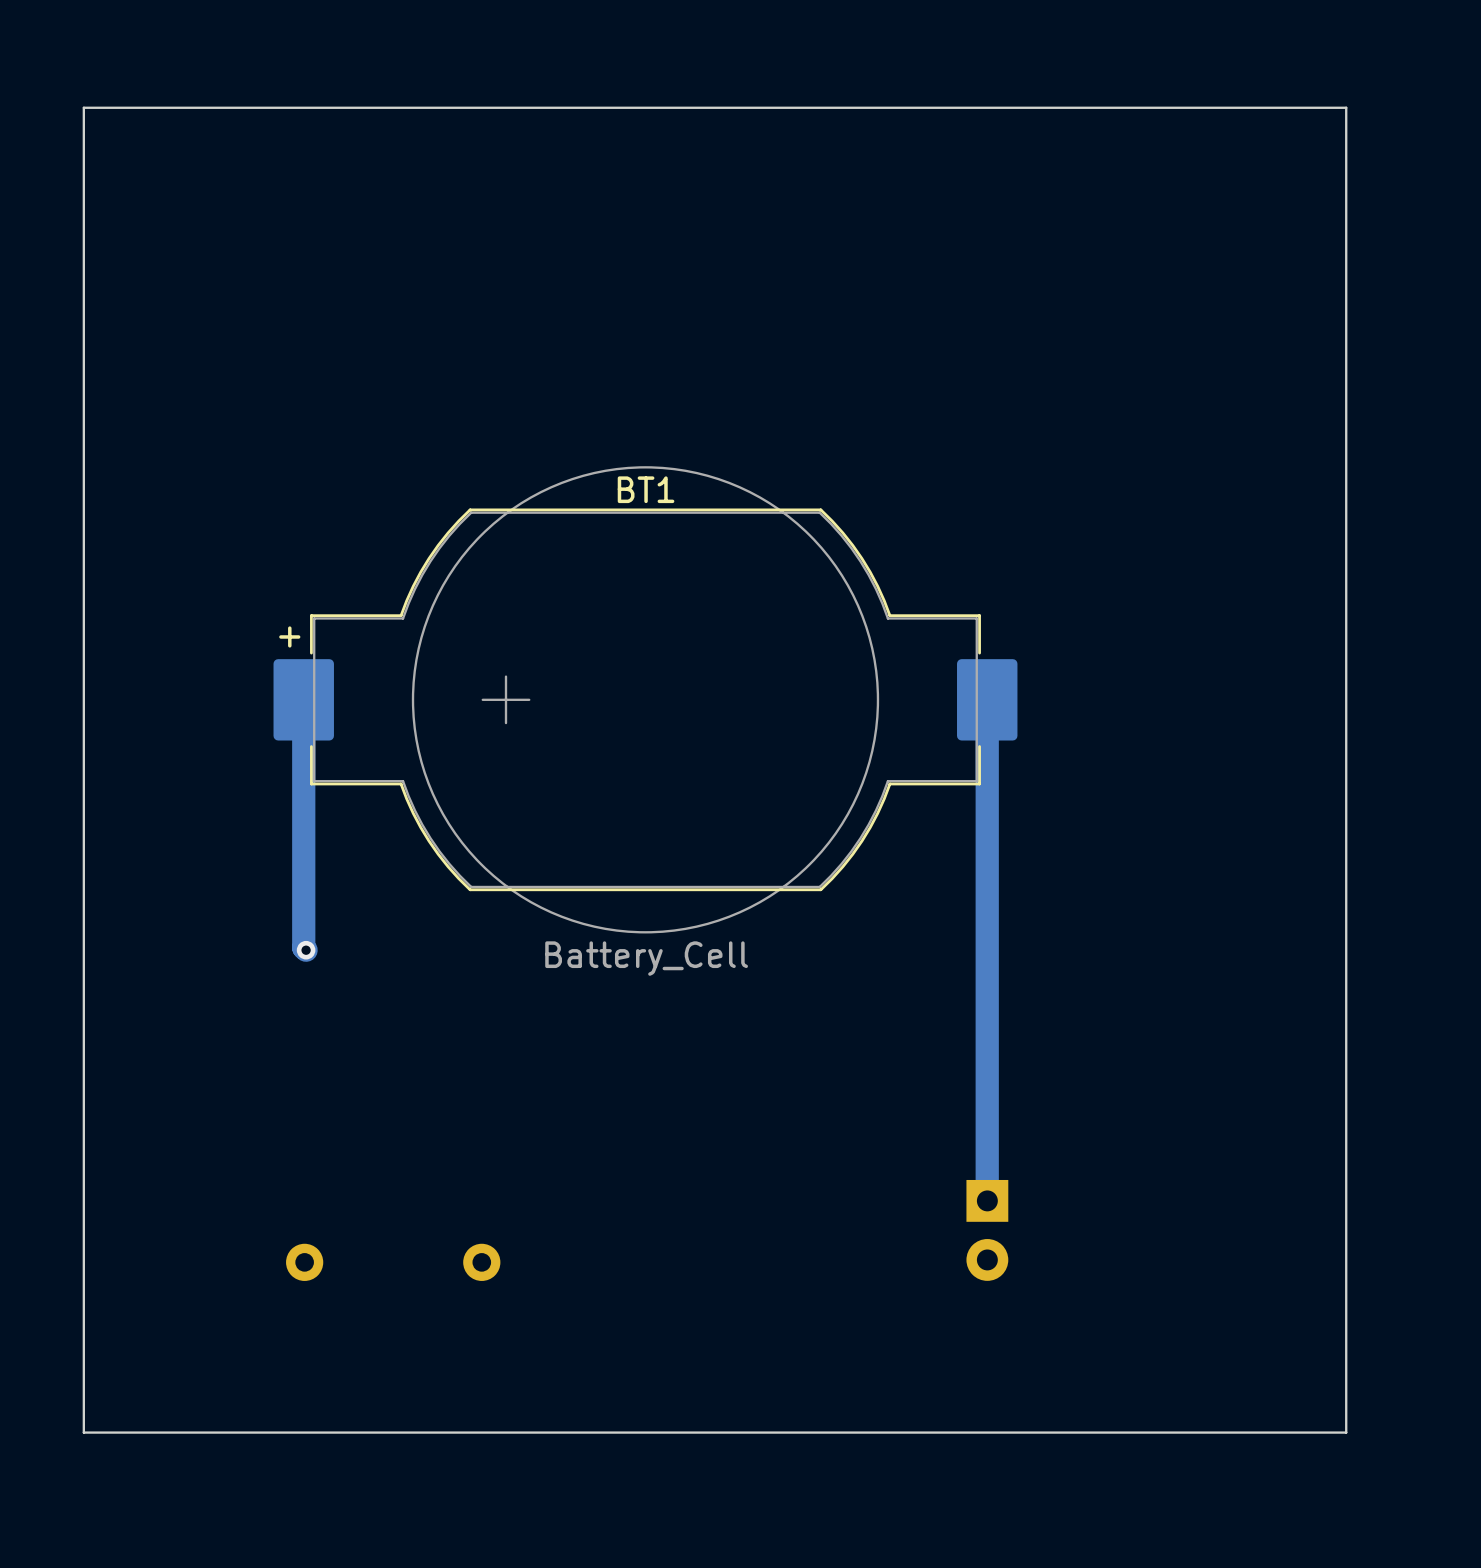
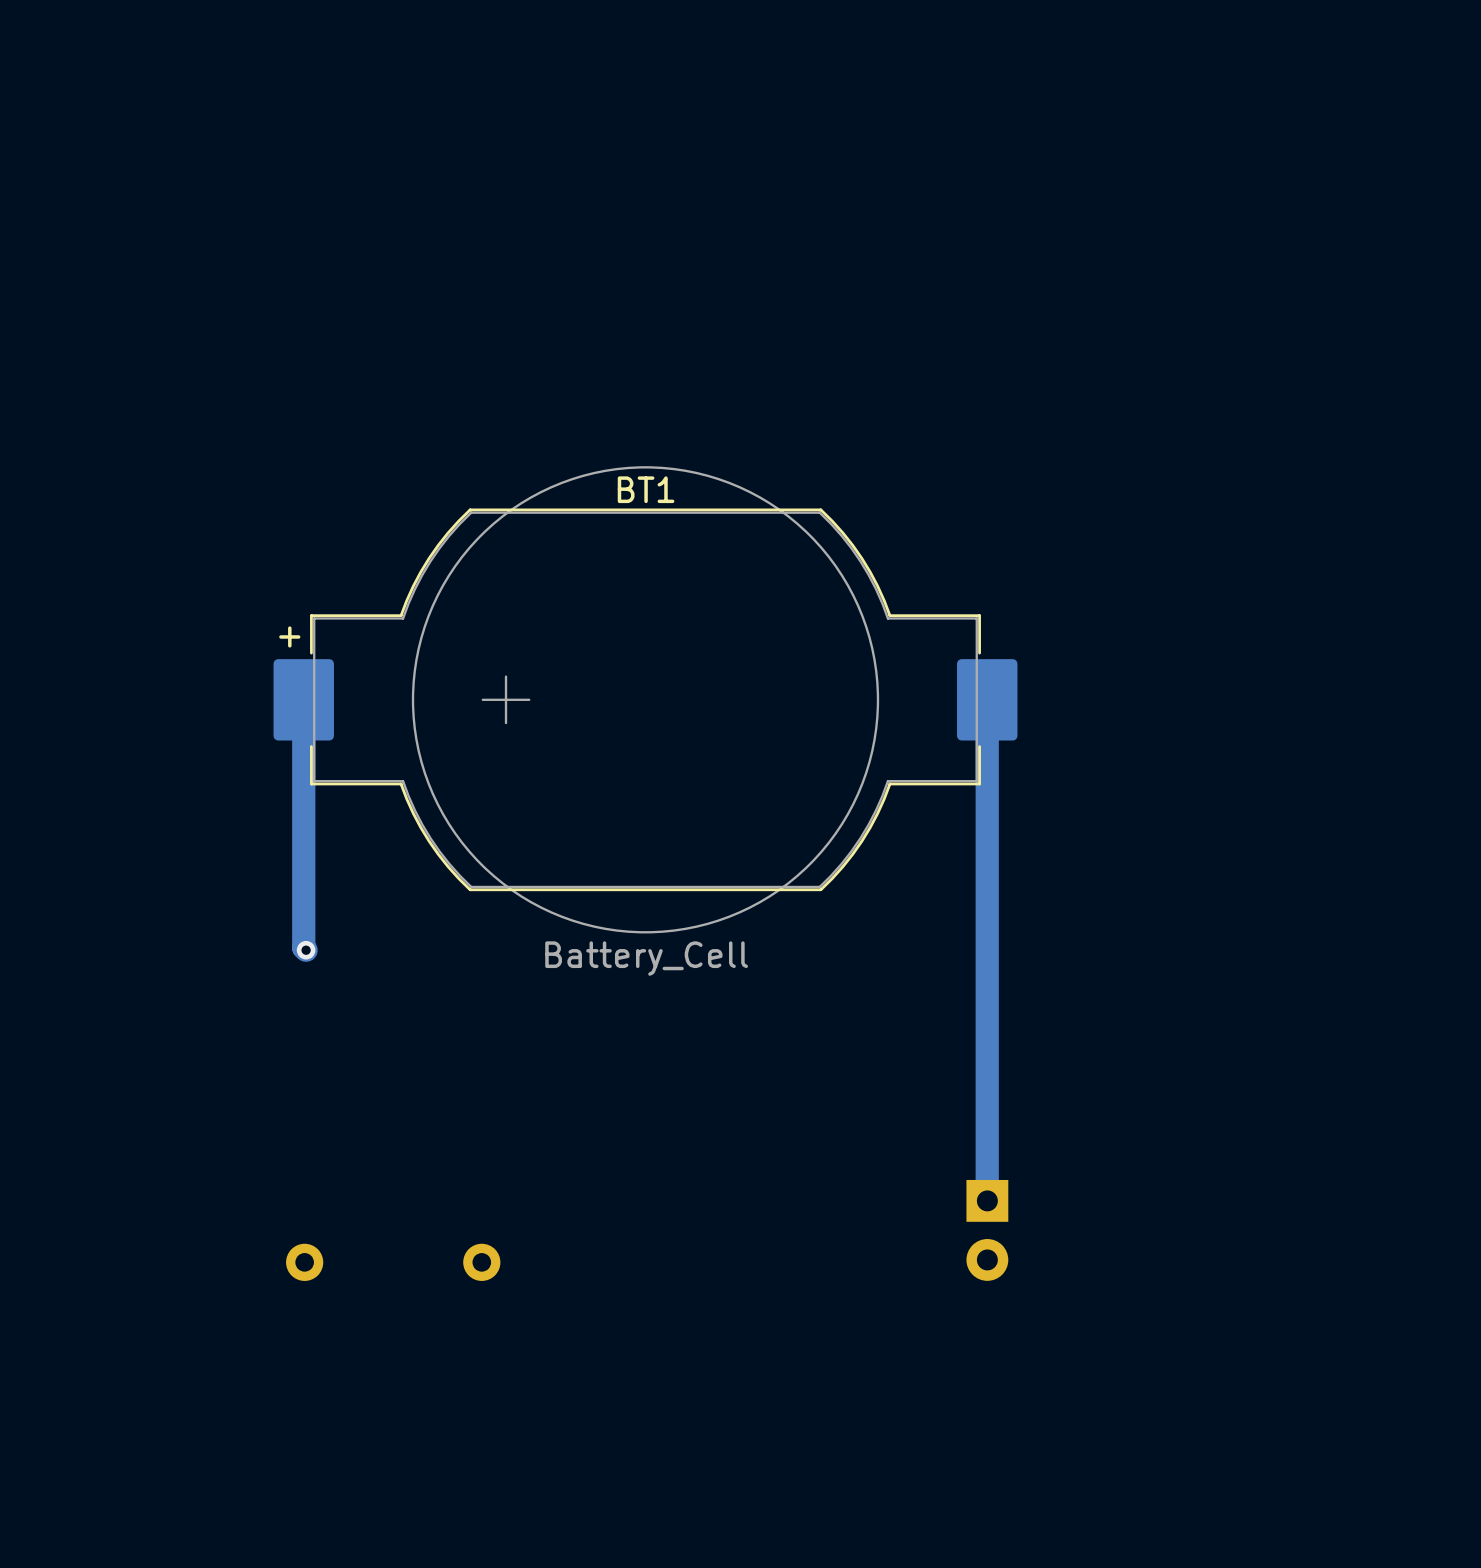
board edge: (1346, 107) (83, 107) (83, 1432) (1346, 1432) (1346, 107) -> none

